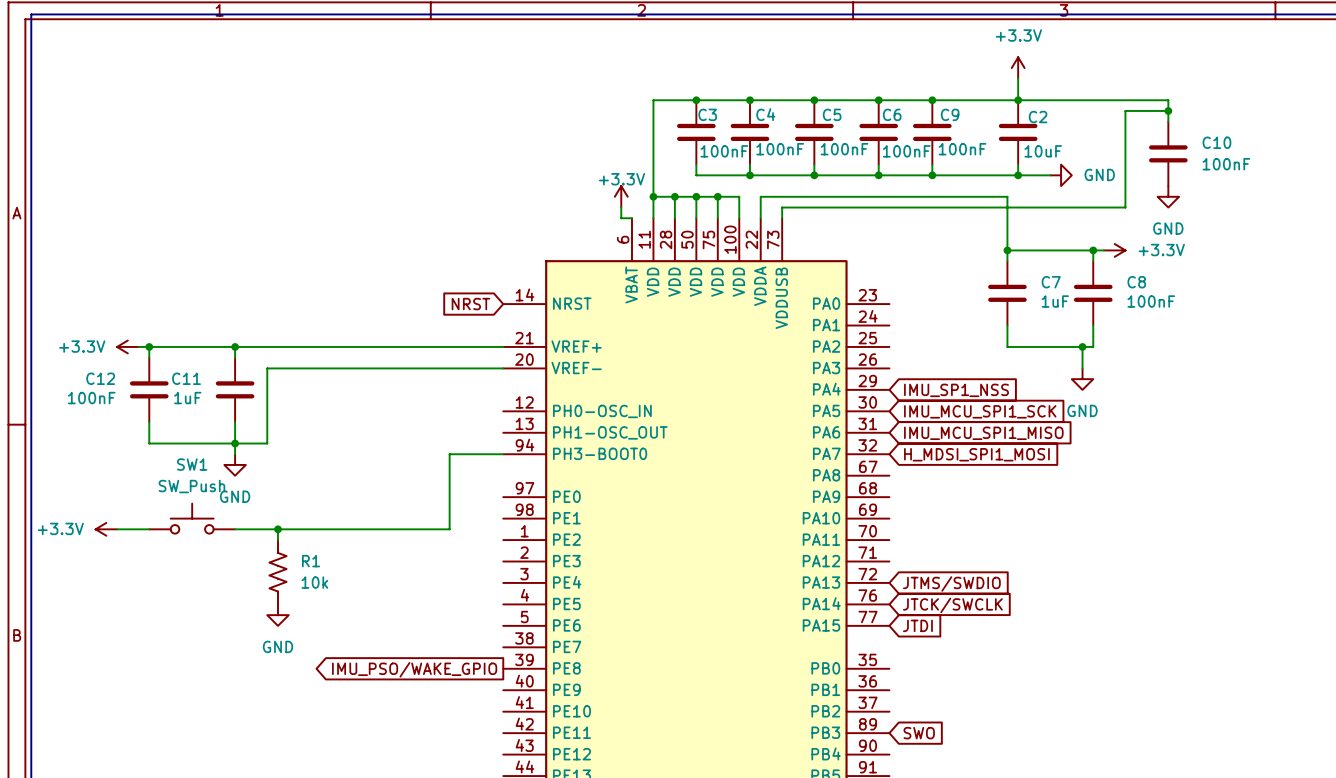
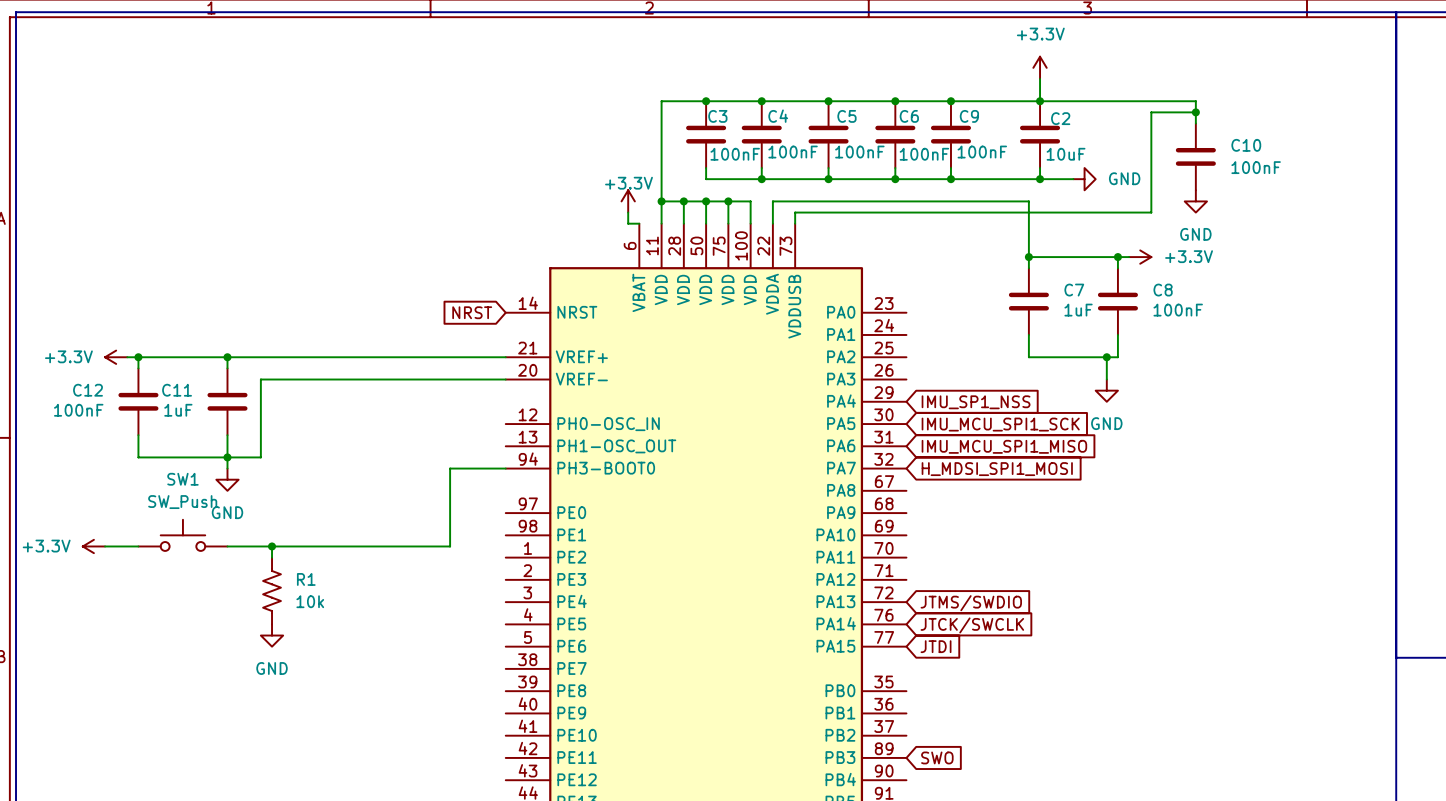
global label: IMU_PSO/WAKE_GPIO (414, 669) -> none

